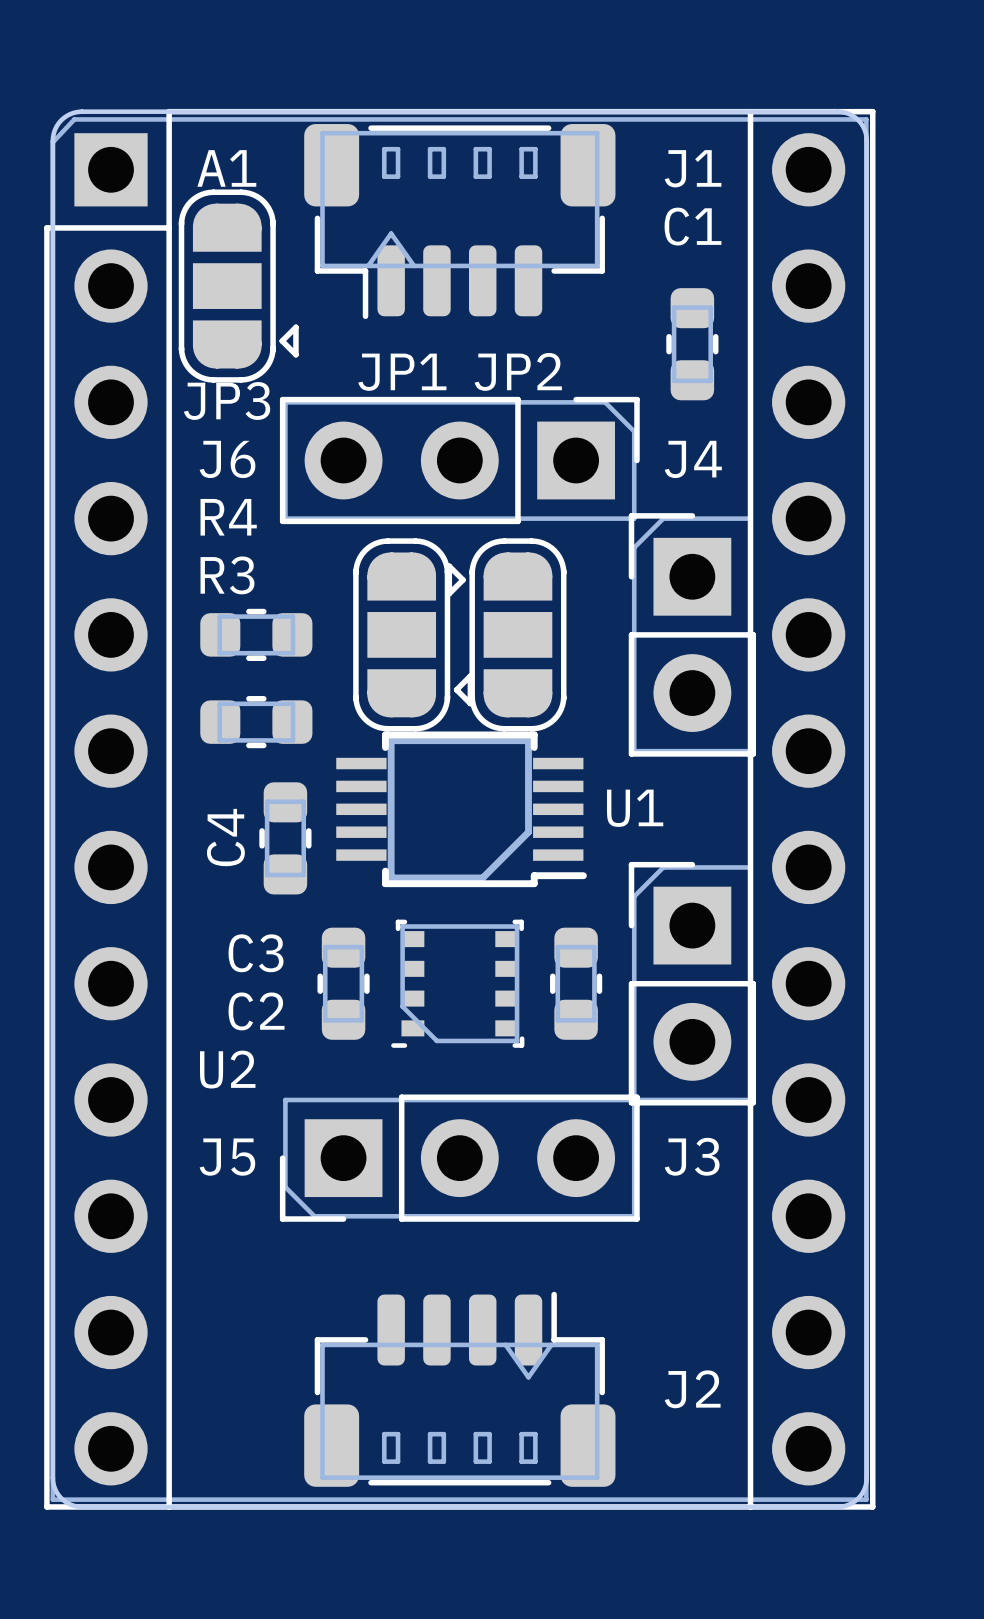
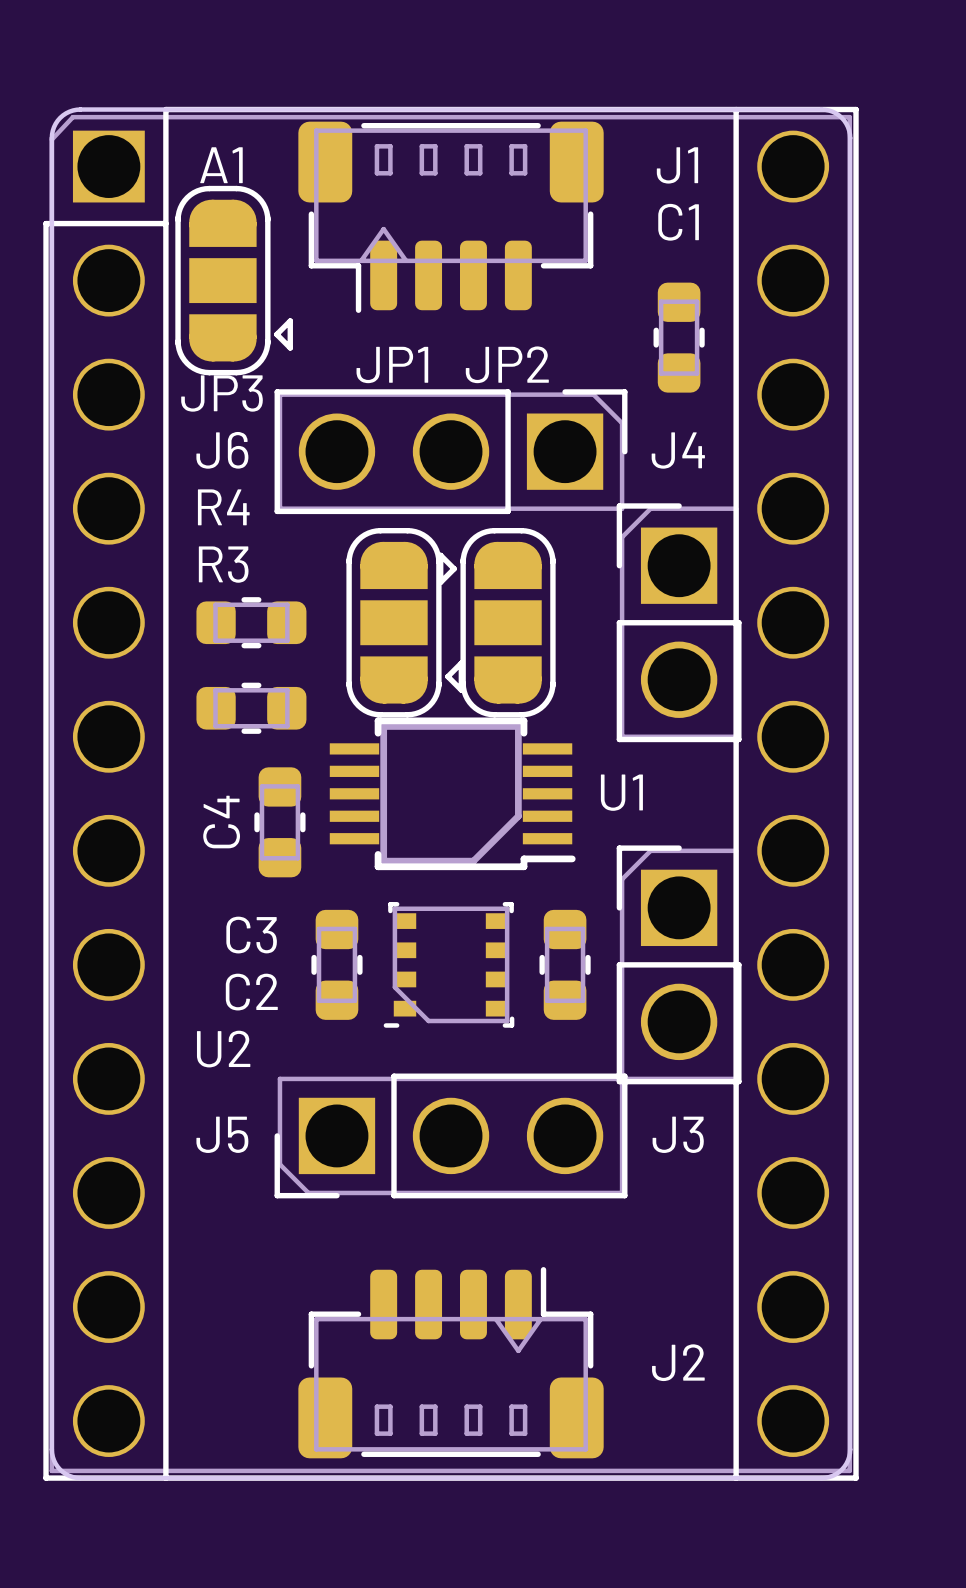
A1 footprint: [44, 108, 876, 1510] -> [43, 106, 859, 1481]
J6 footprint: [279, 396, 640, 525] -> [274, 389, 628, 515]
J4 footprint: [628, 513, 757, 757] -> [616, 503, 742, 743]
J3 footprint: [628, 861, 757, 1106] -> [616, 845, 742, 1085]
J5 footprint: [279, 1094, 640, 1222] -> [274, 1073, 628, 1199]

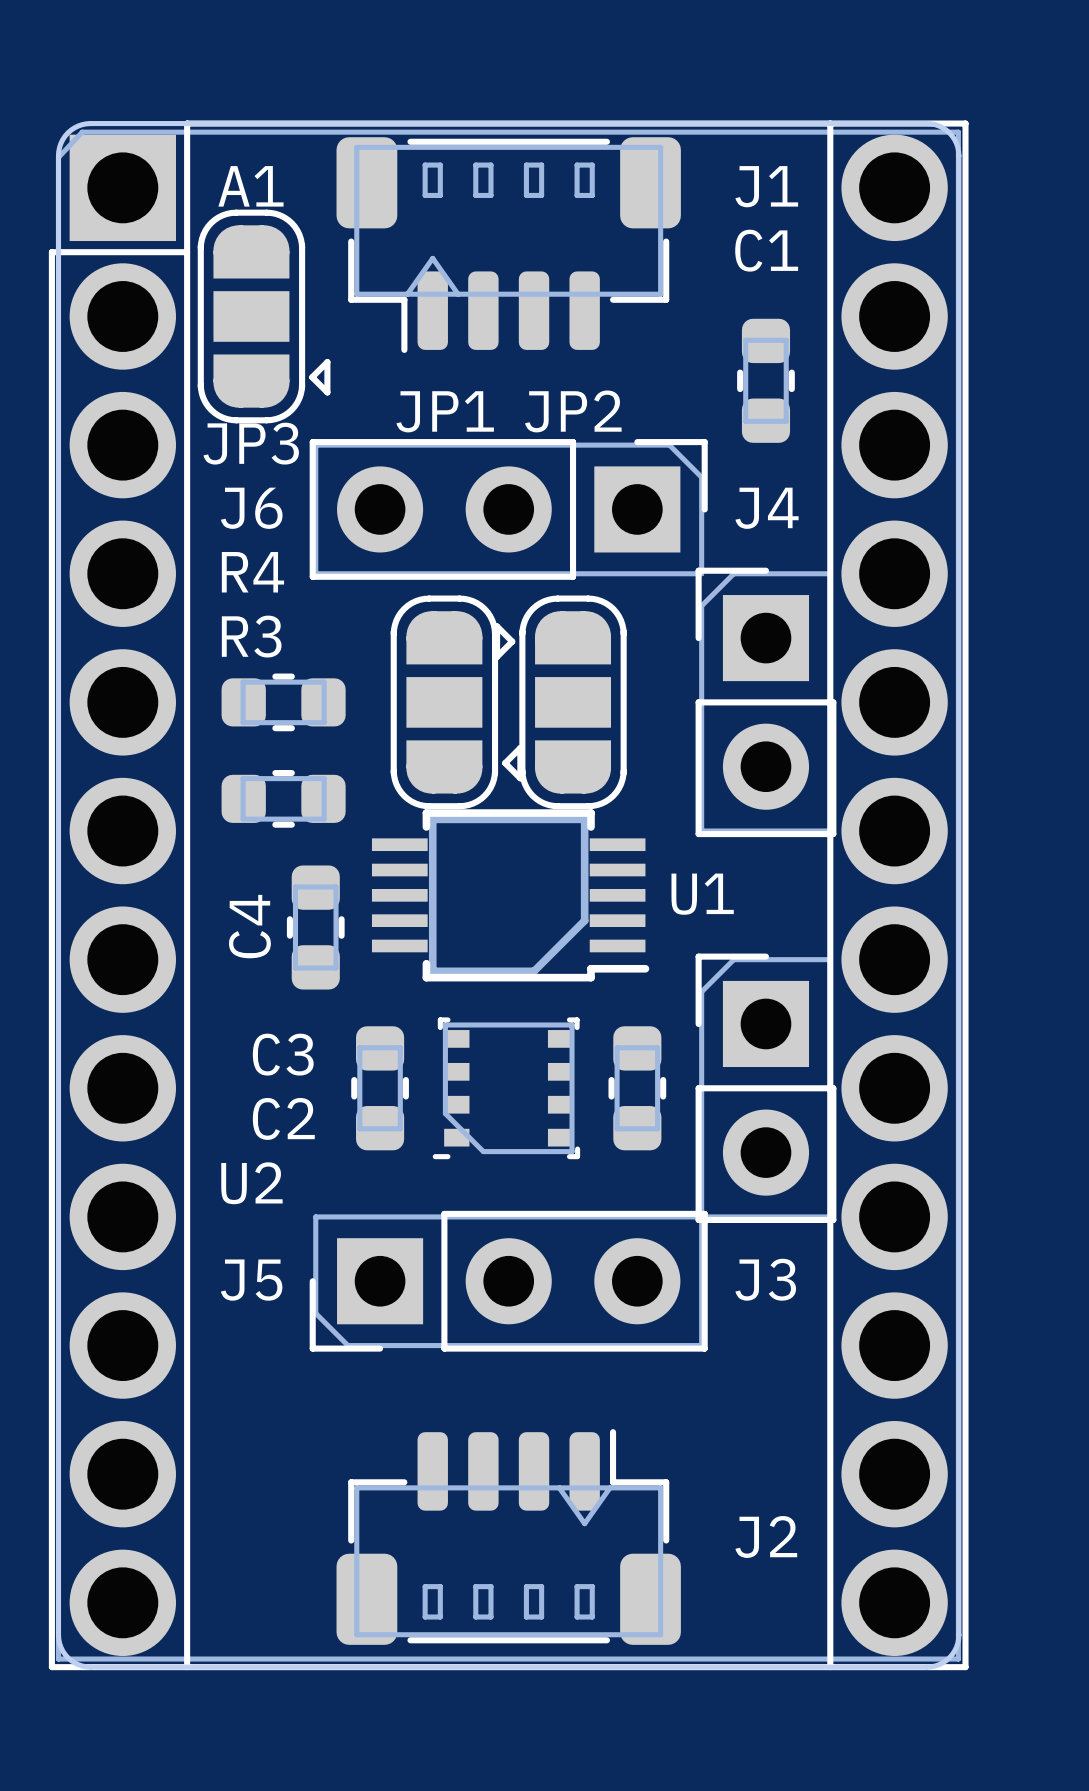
A1 footprint: [43, 106, 859, 1481] -> [48, 120, 969, 1671]
J6 footprint: [274, 389, 628, 515] -> [309, 439, 708, 580]
J4 footprint: [616, 503, 742, 743] -> [695, 567, 837, 838]
J3 footprint: [616, 845, 742, 1085] -> [695, 953, 837, 1224]
J5 footprint: [274, 1073, 628, 1199] -> [309, 1210, 708, 1352]

